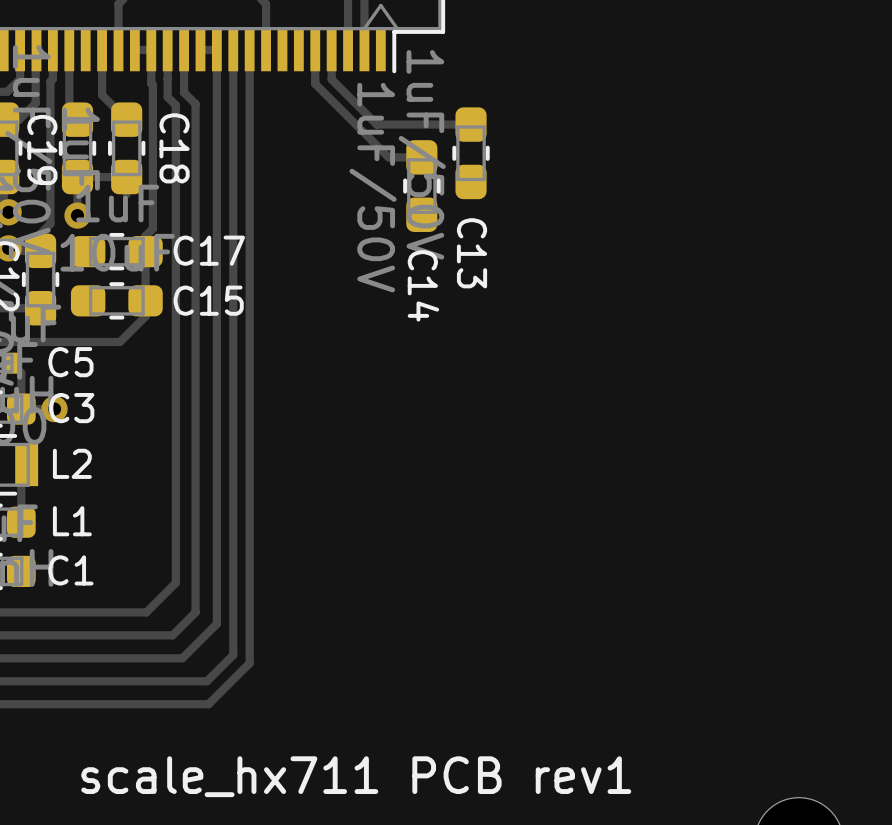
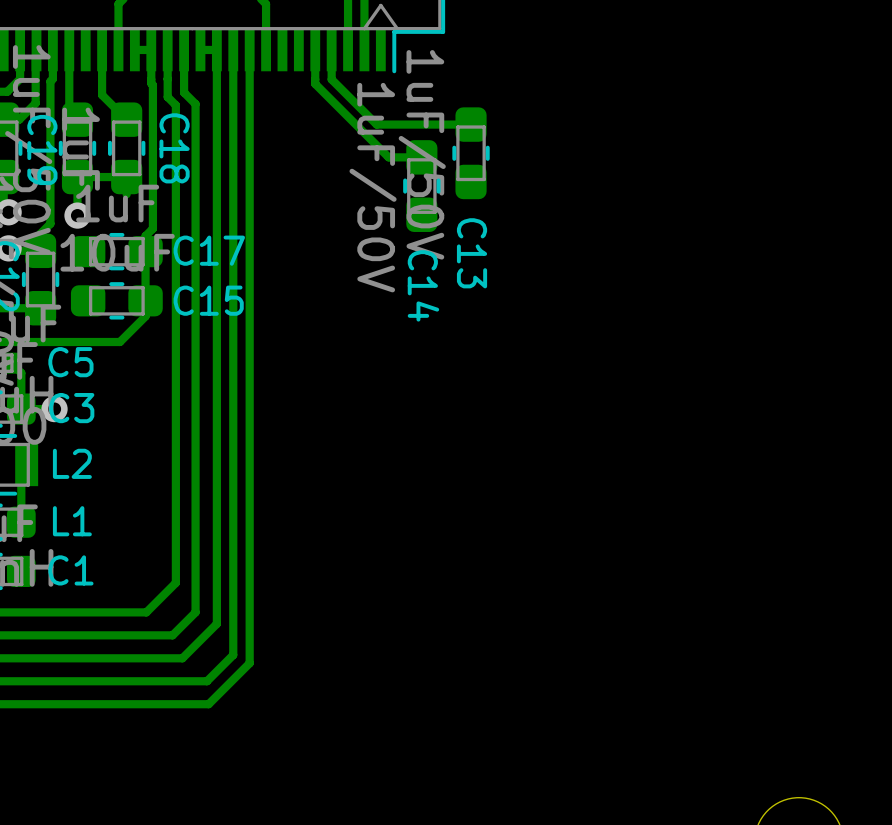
text: scale_hx711 PCB rev1 (356, 776) -> none

